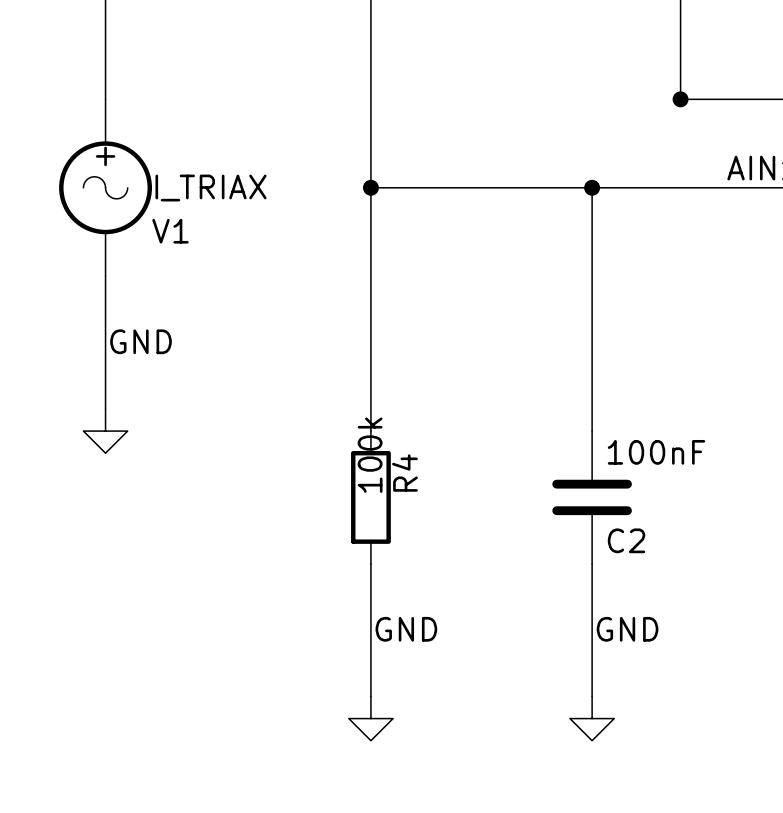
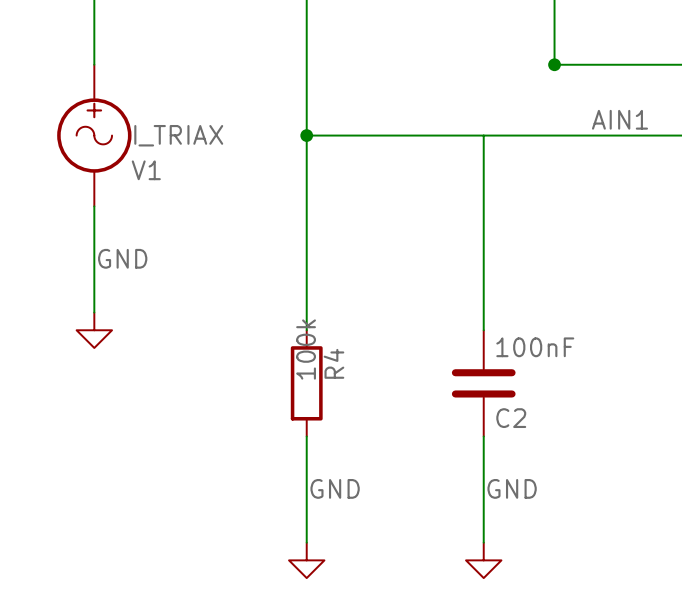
junction: (592, 187) -> none

